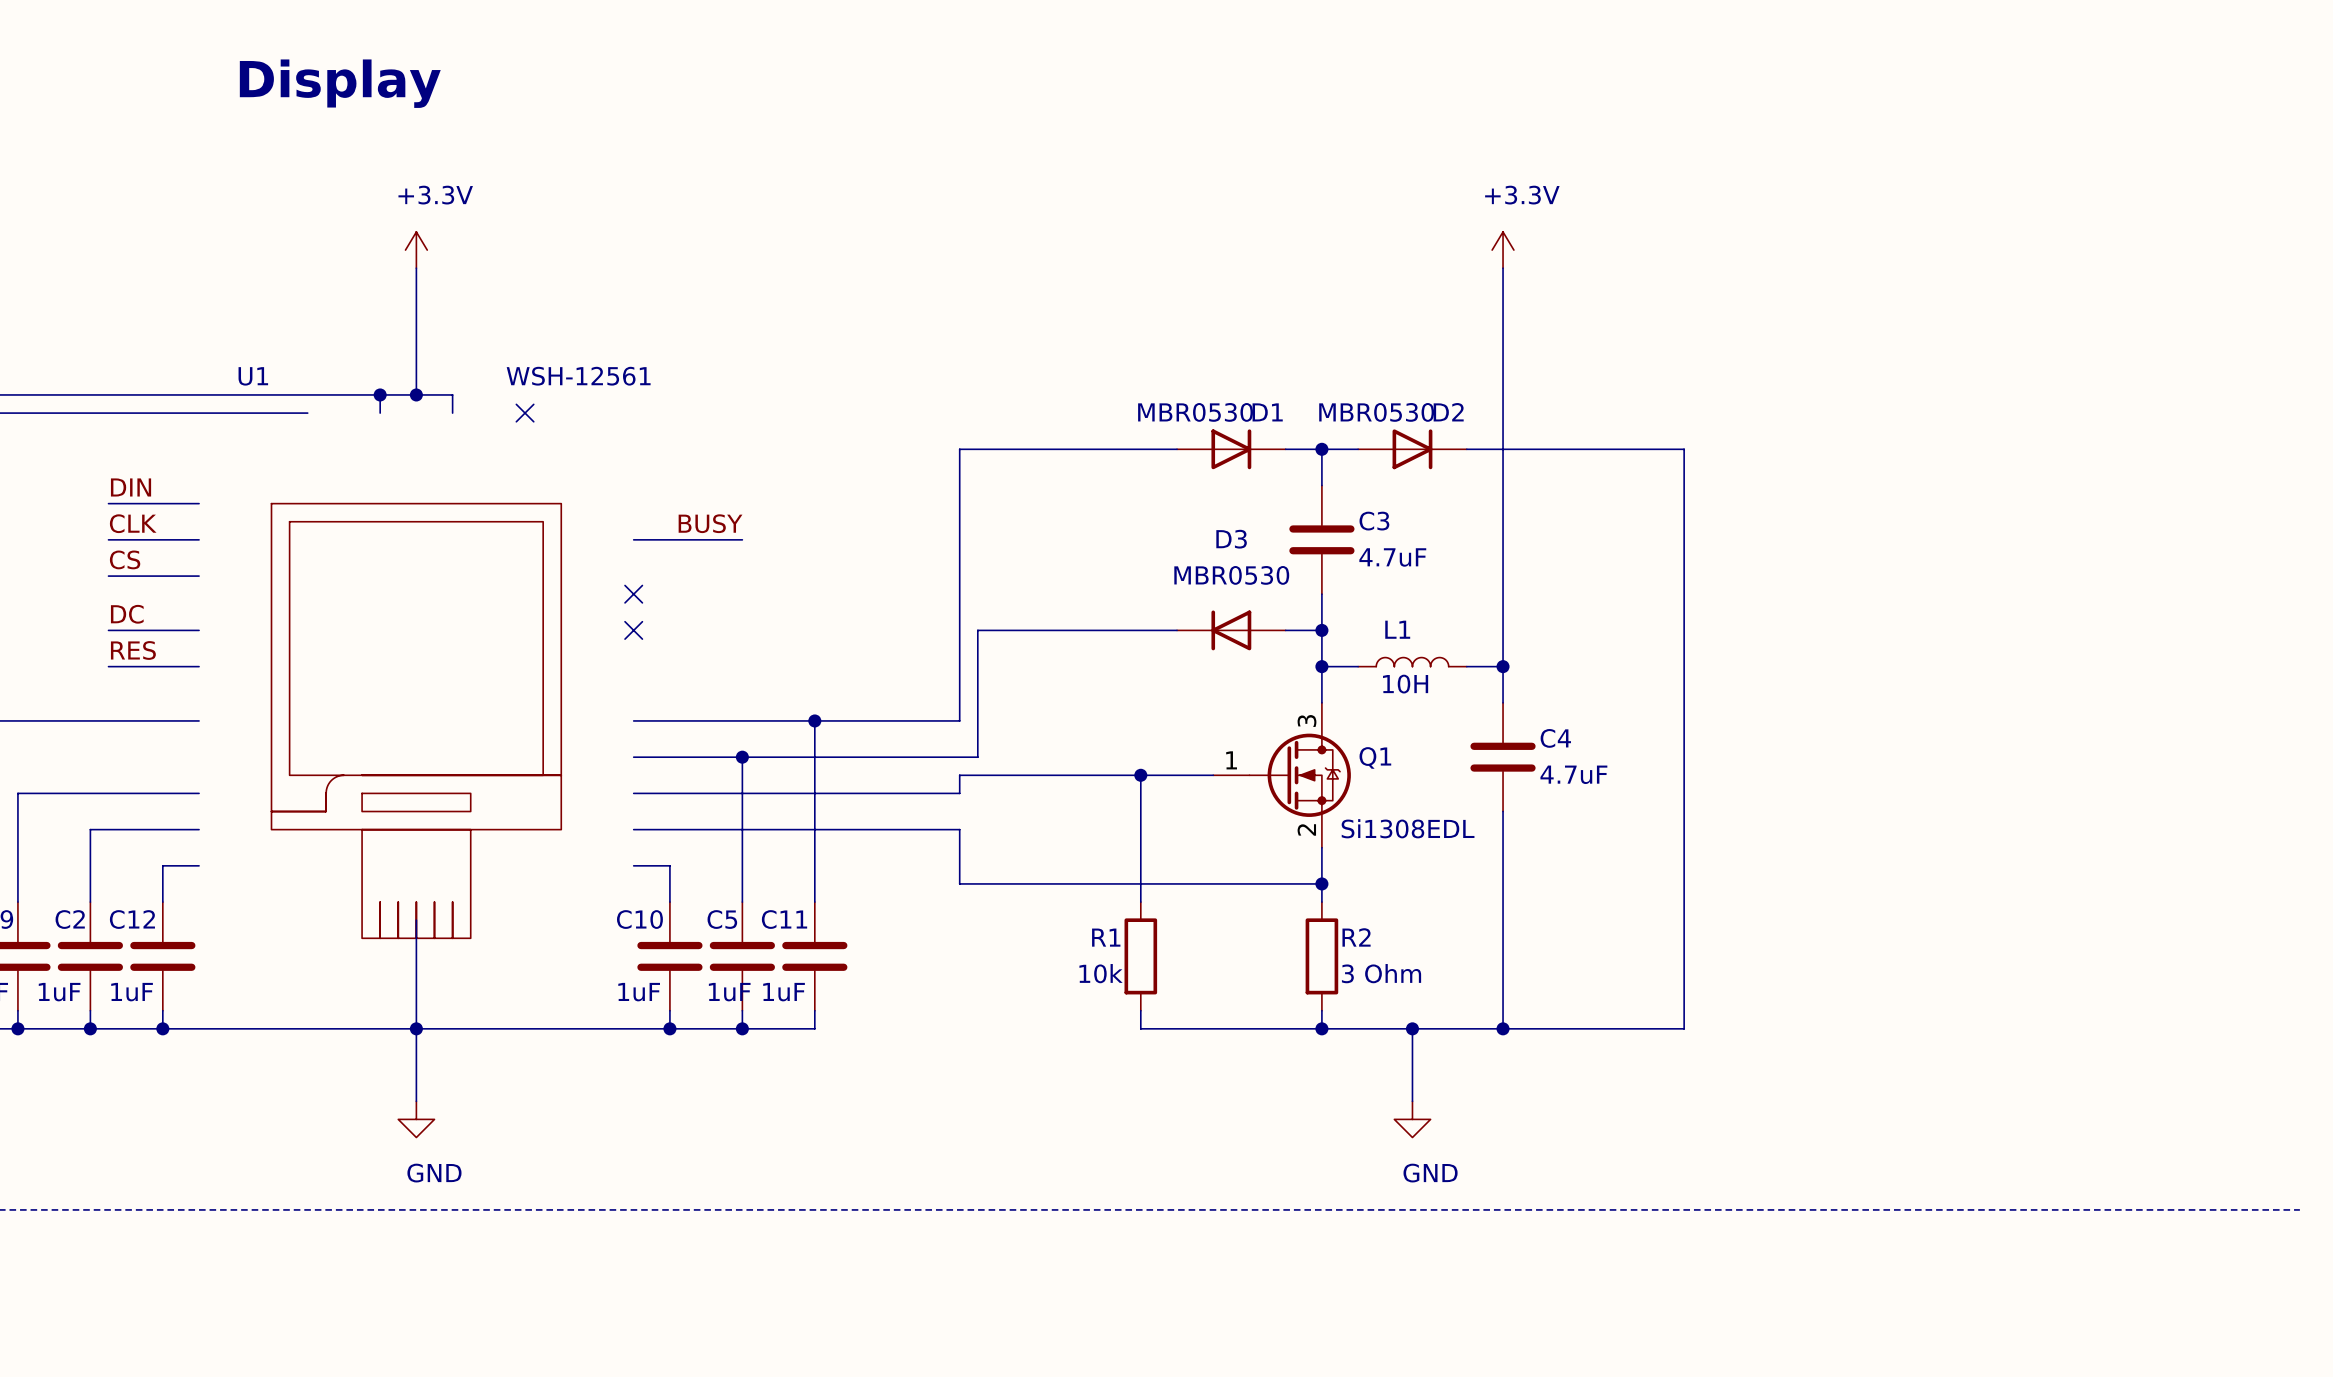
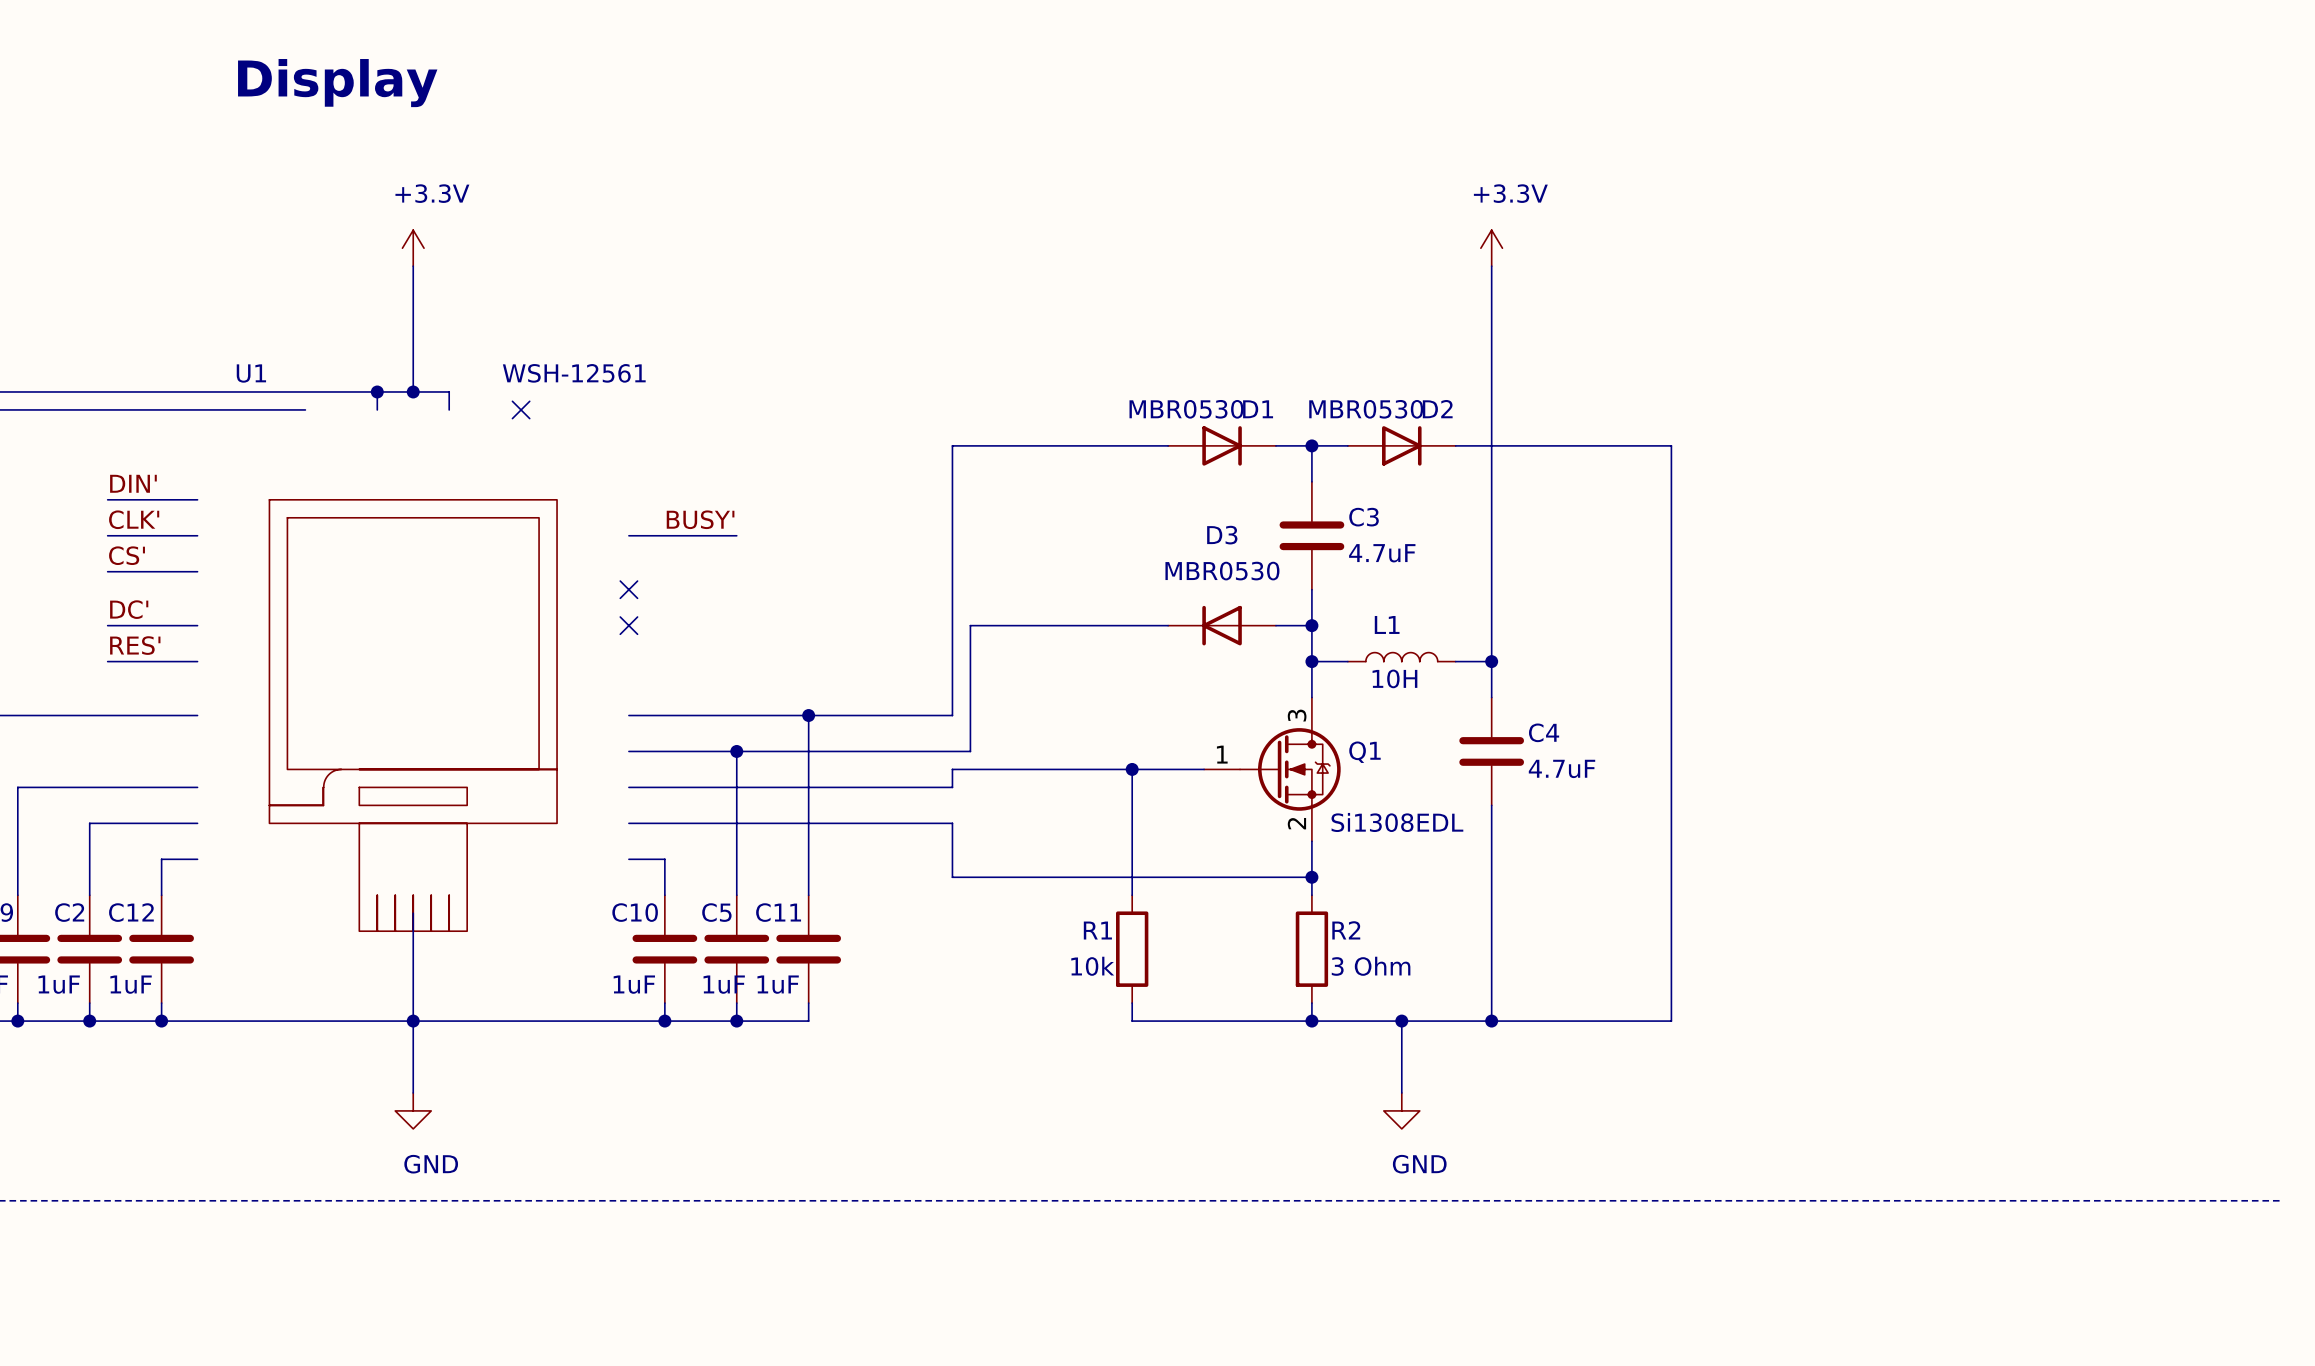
label: DIN (131, 487) -> DIN' (133, 483)
label: CLK (133, 523) -> CLK' (134, 519)
label: BUSY (710, 523) -> BUSY' (700, 519)
label: CS (125, 559) -> CS' (127, 555)
label: DC (127, 614) -> DC' (129, 609)
label: RES (133, 650) -> RES' (135, 645)

